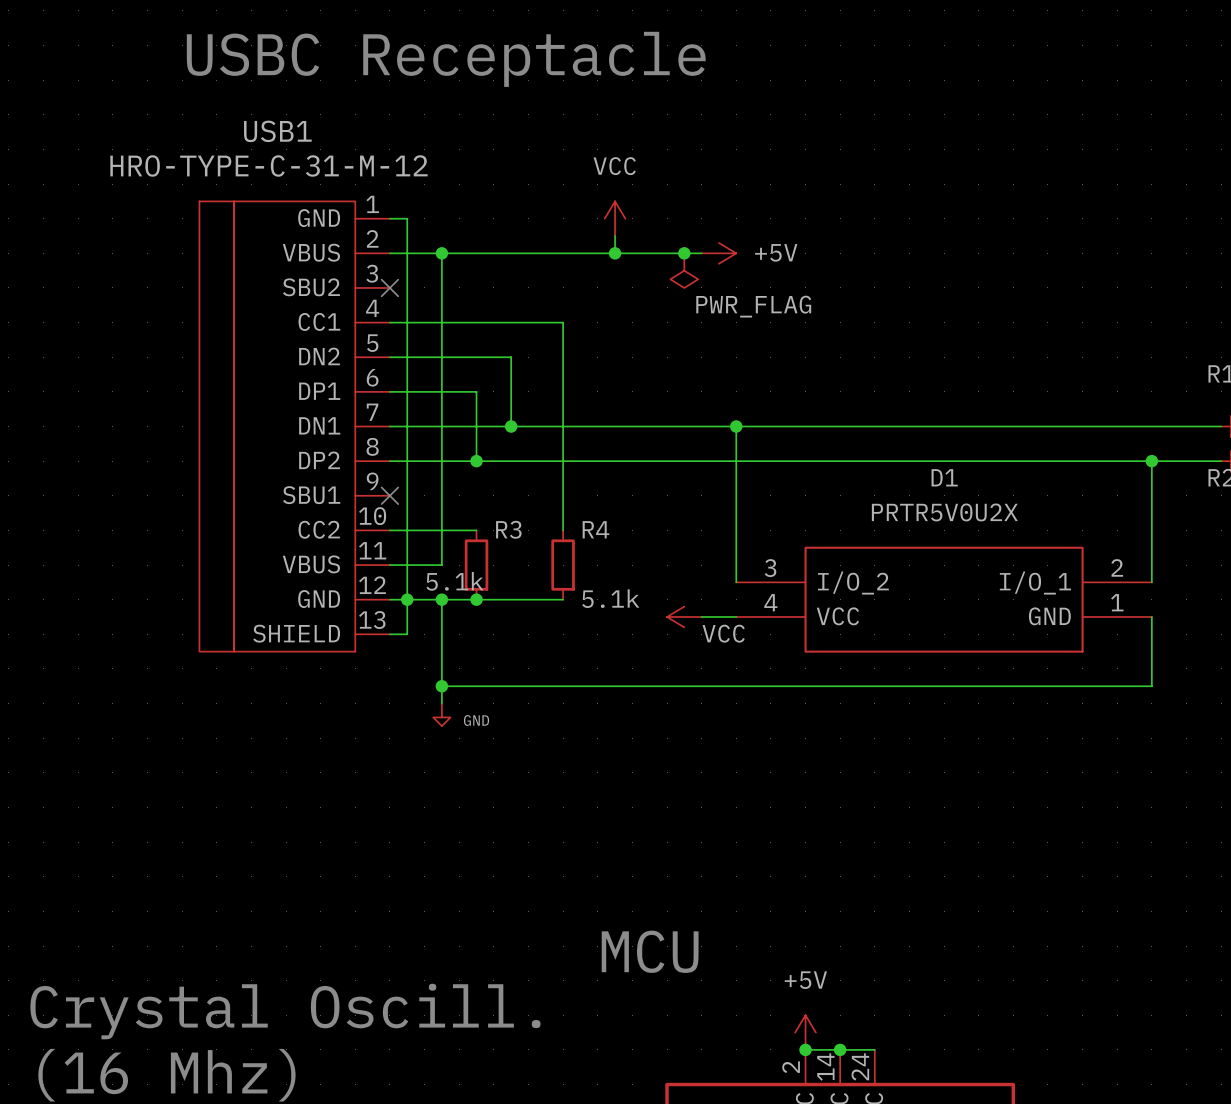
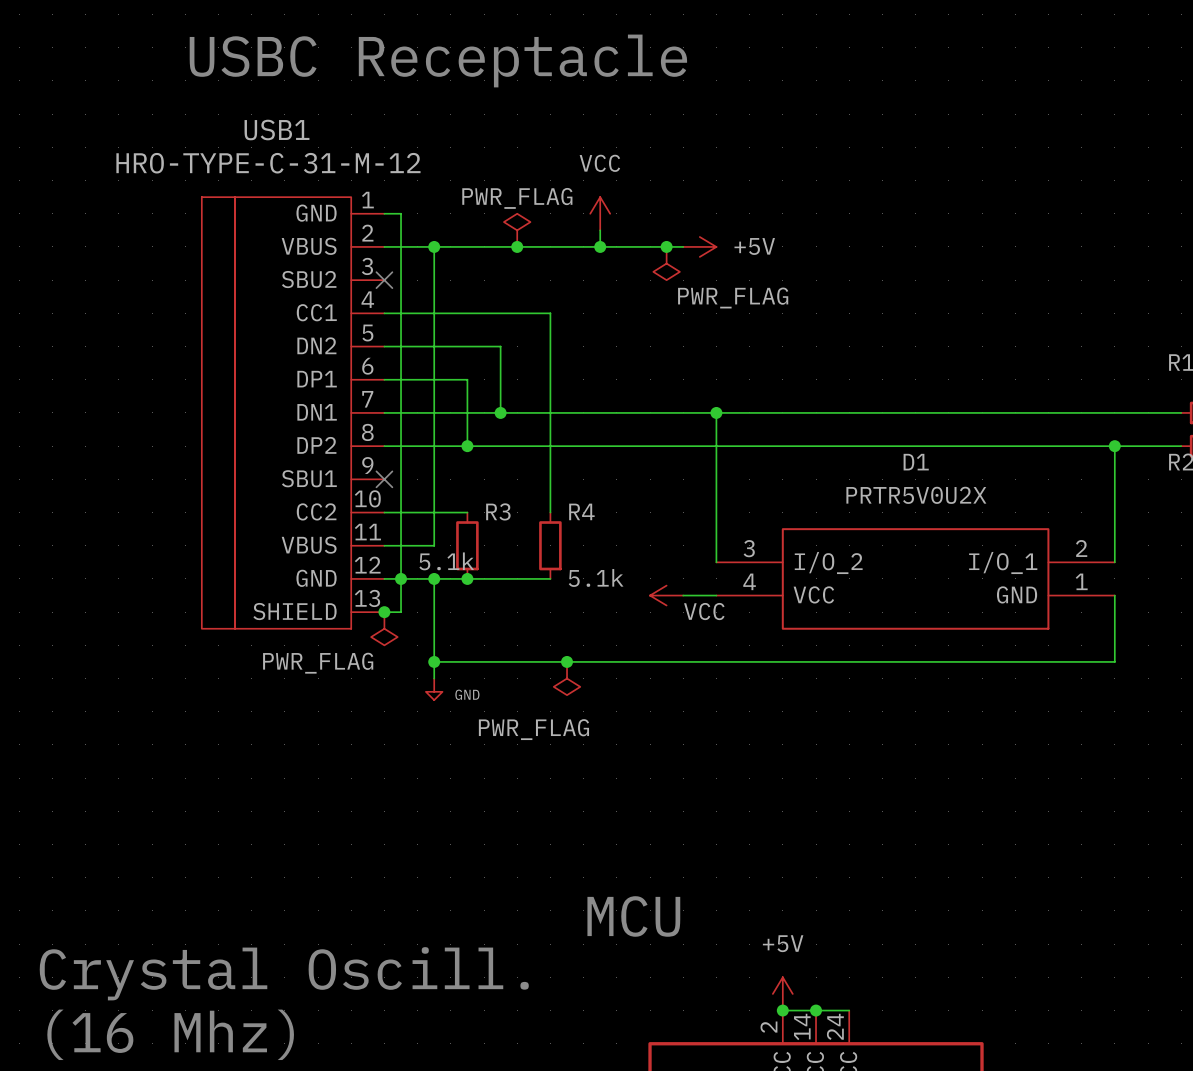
power symbol: none -> PWR_FLAG (517, 230)
junction: none -> (517, 246)
junction: none -> (384, 612)
power symbol: none -> PWR_FLAG (384, 628)
junction: none -> (567, 661)
power symbol: none -> PWR_FLAG (567, 678)

